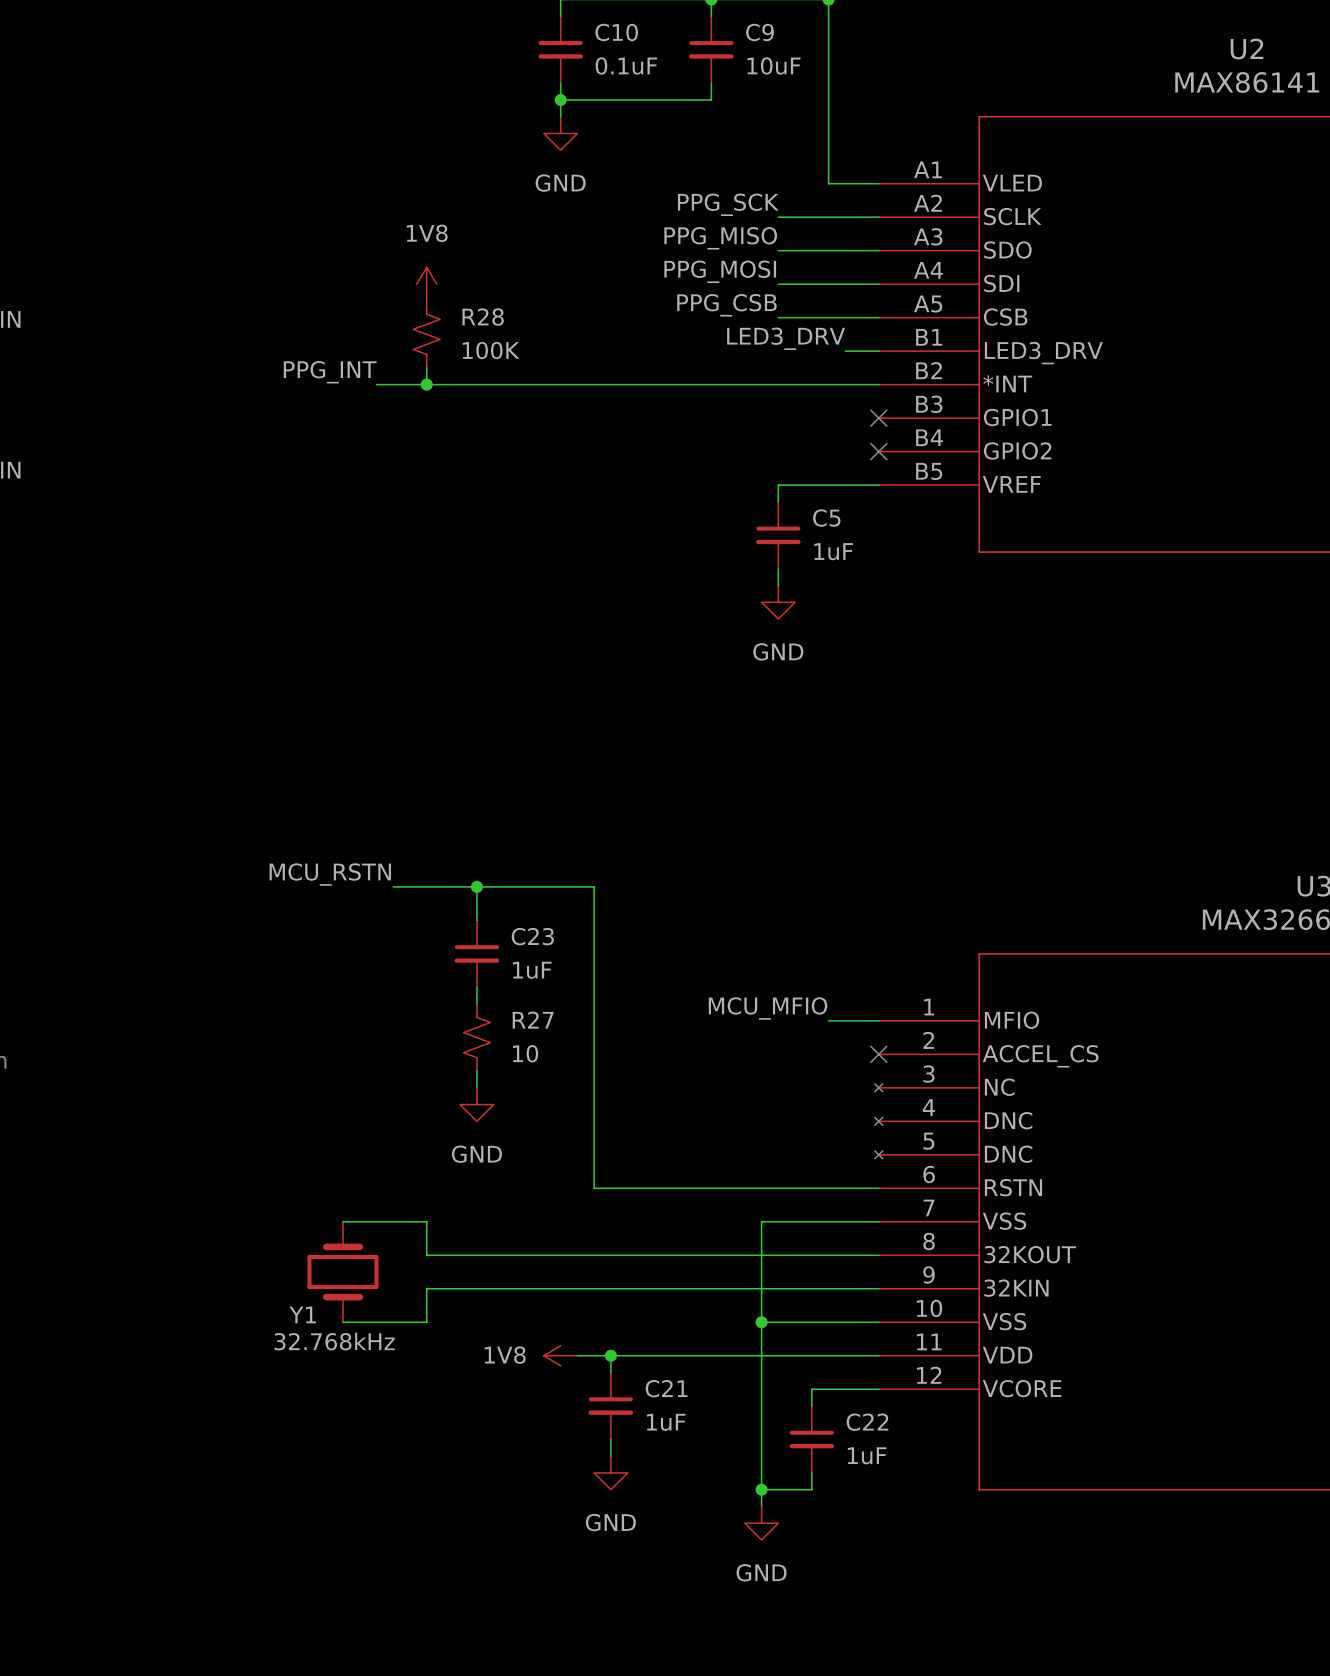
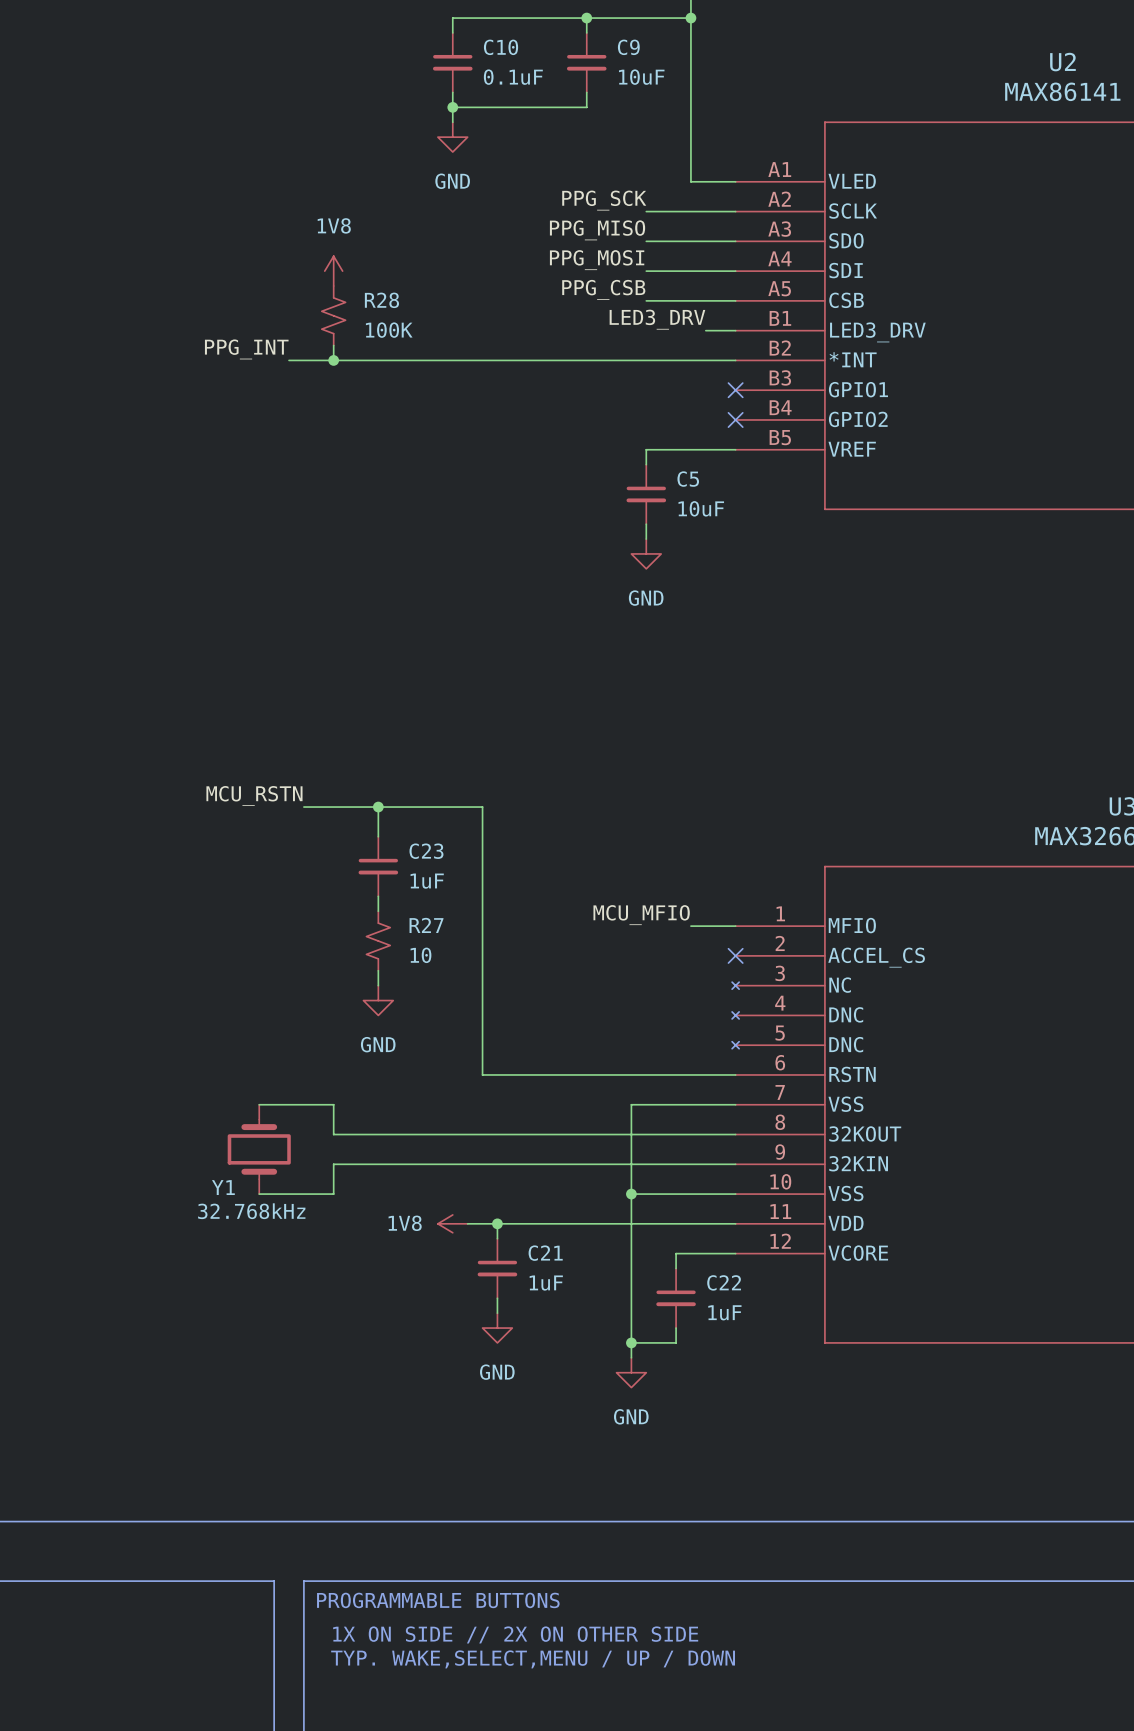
C5 value: 1uF (833, 551) -> 10uF (701, 508)

